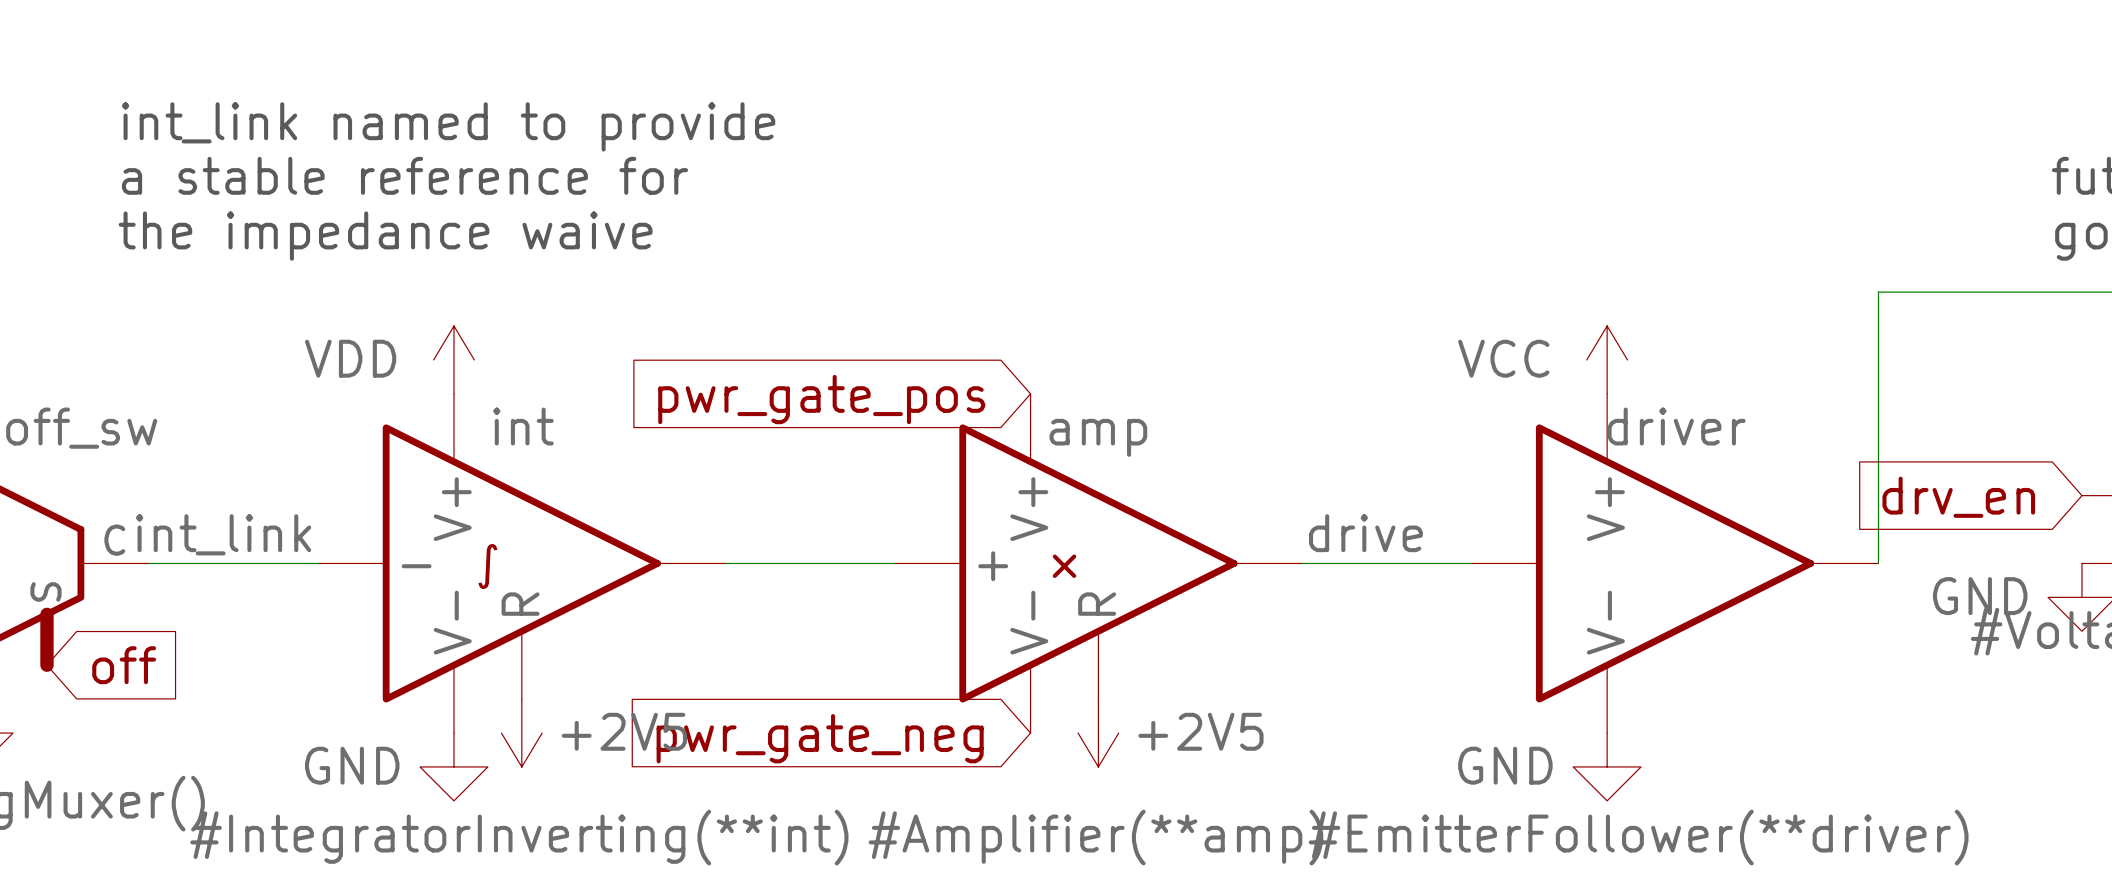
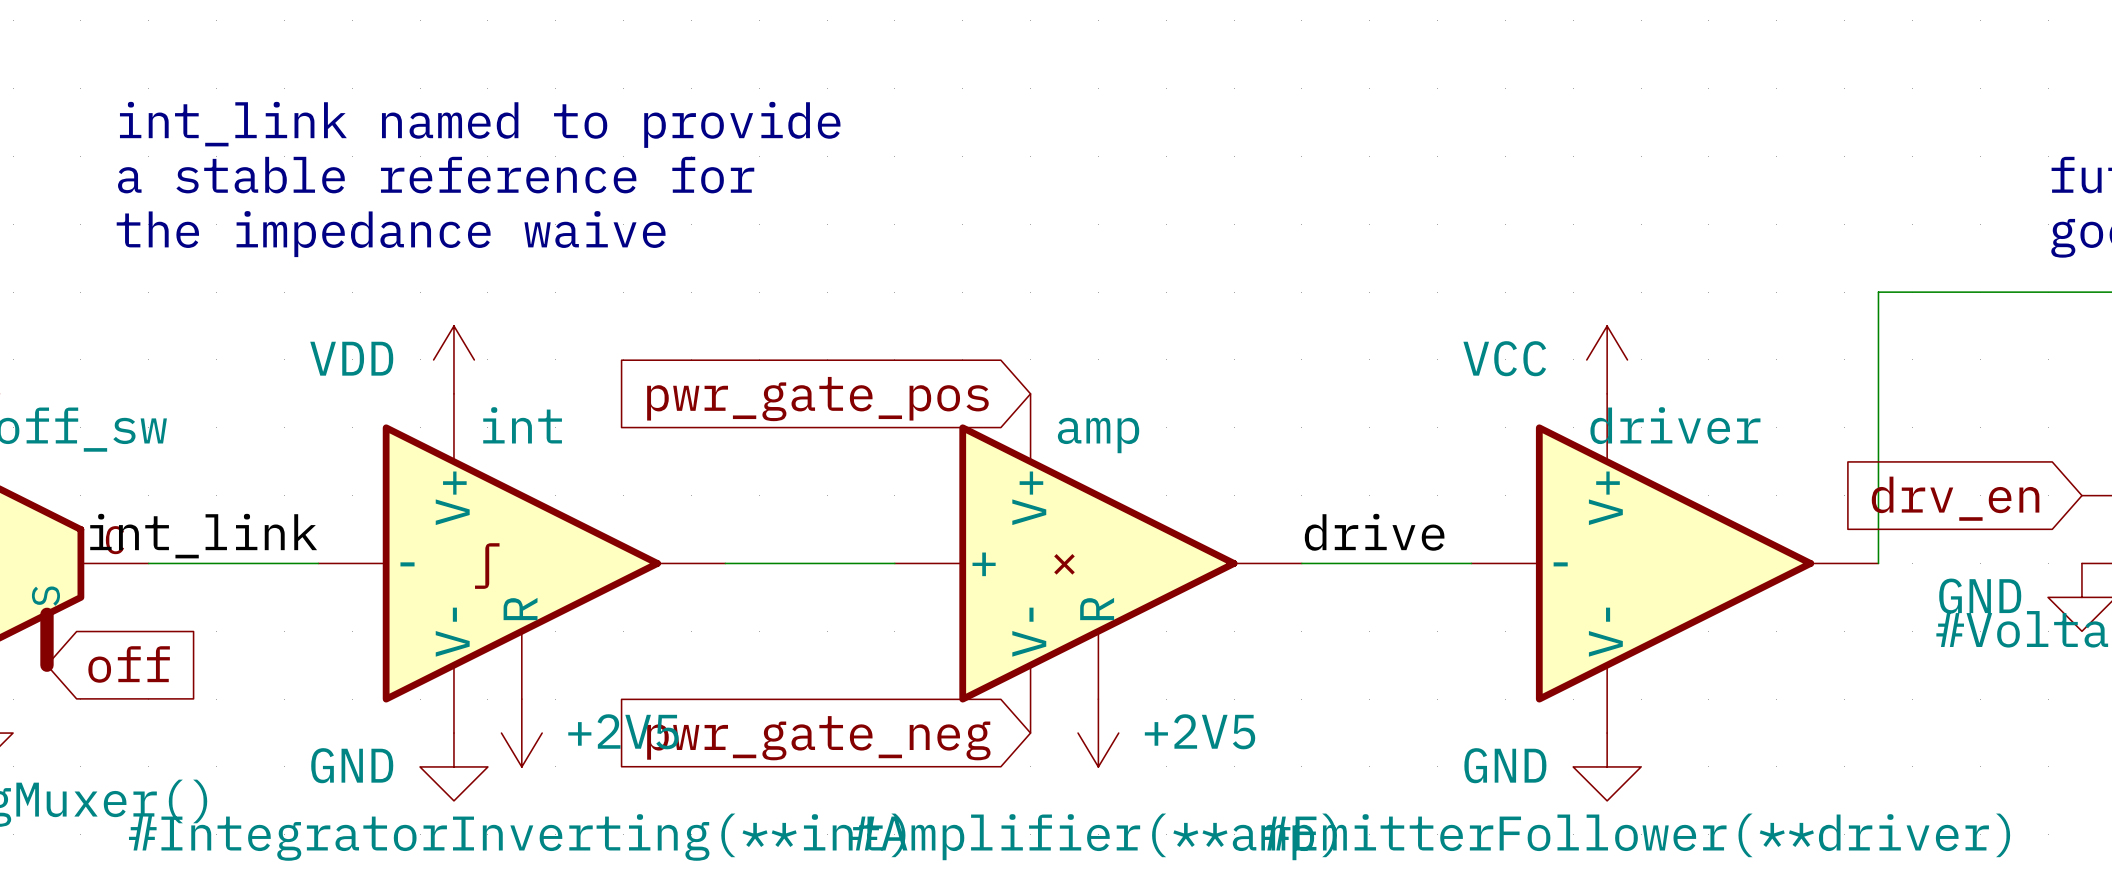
driver pin name: none -> - (1560, 564)

